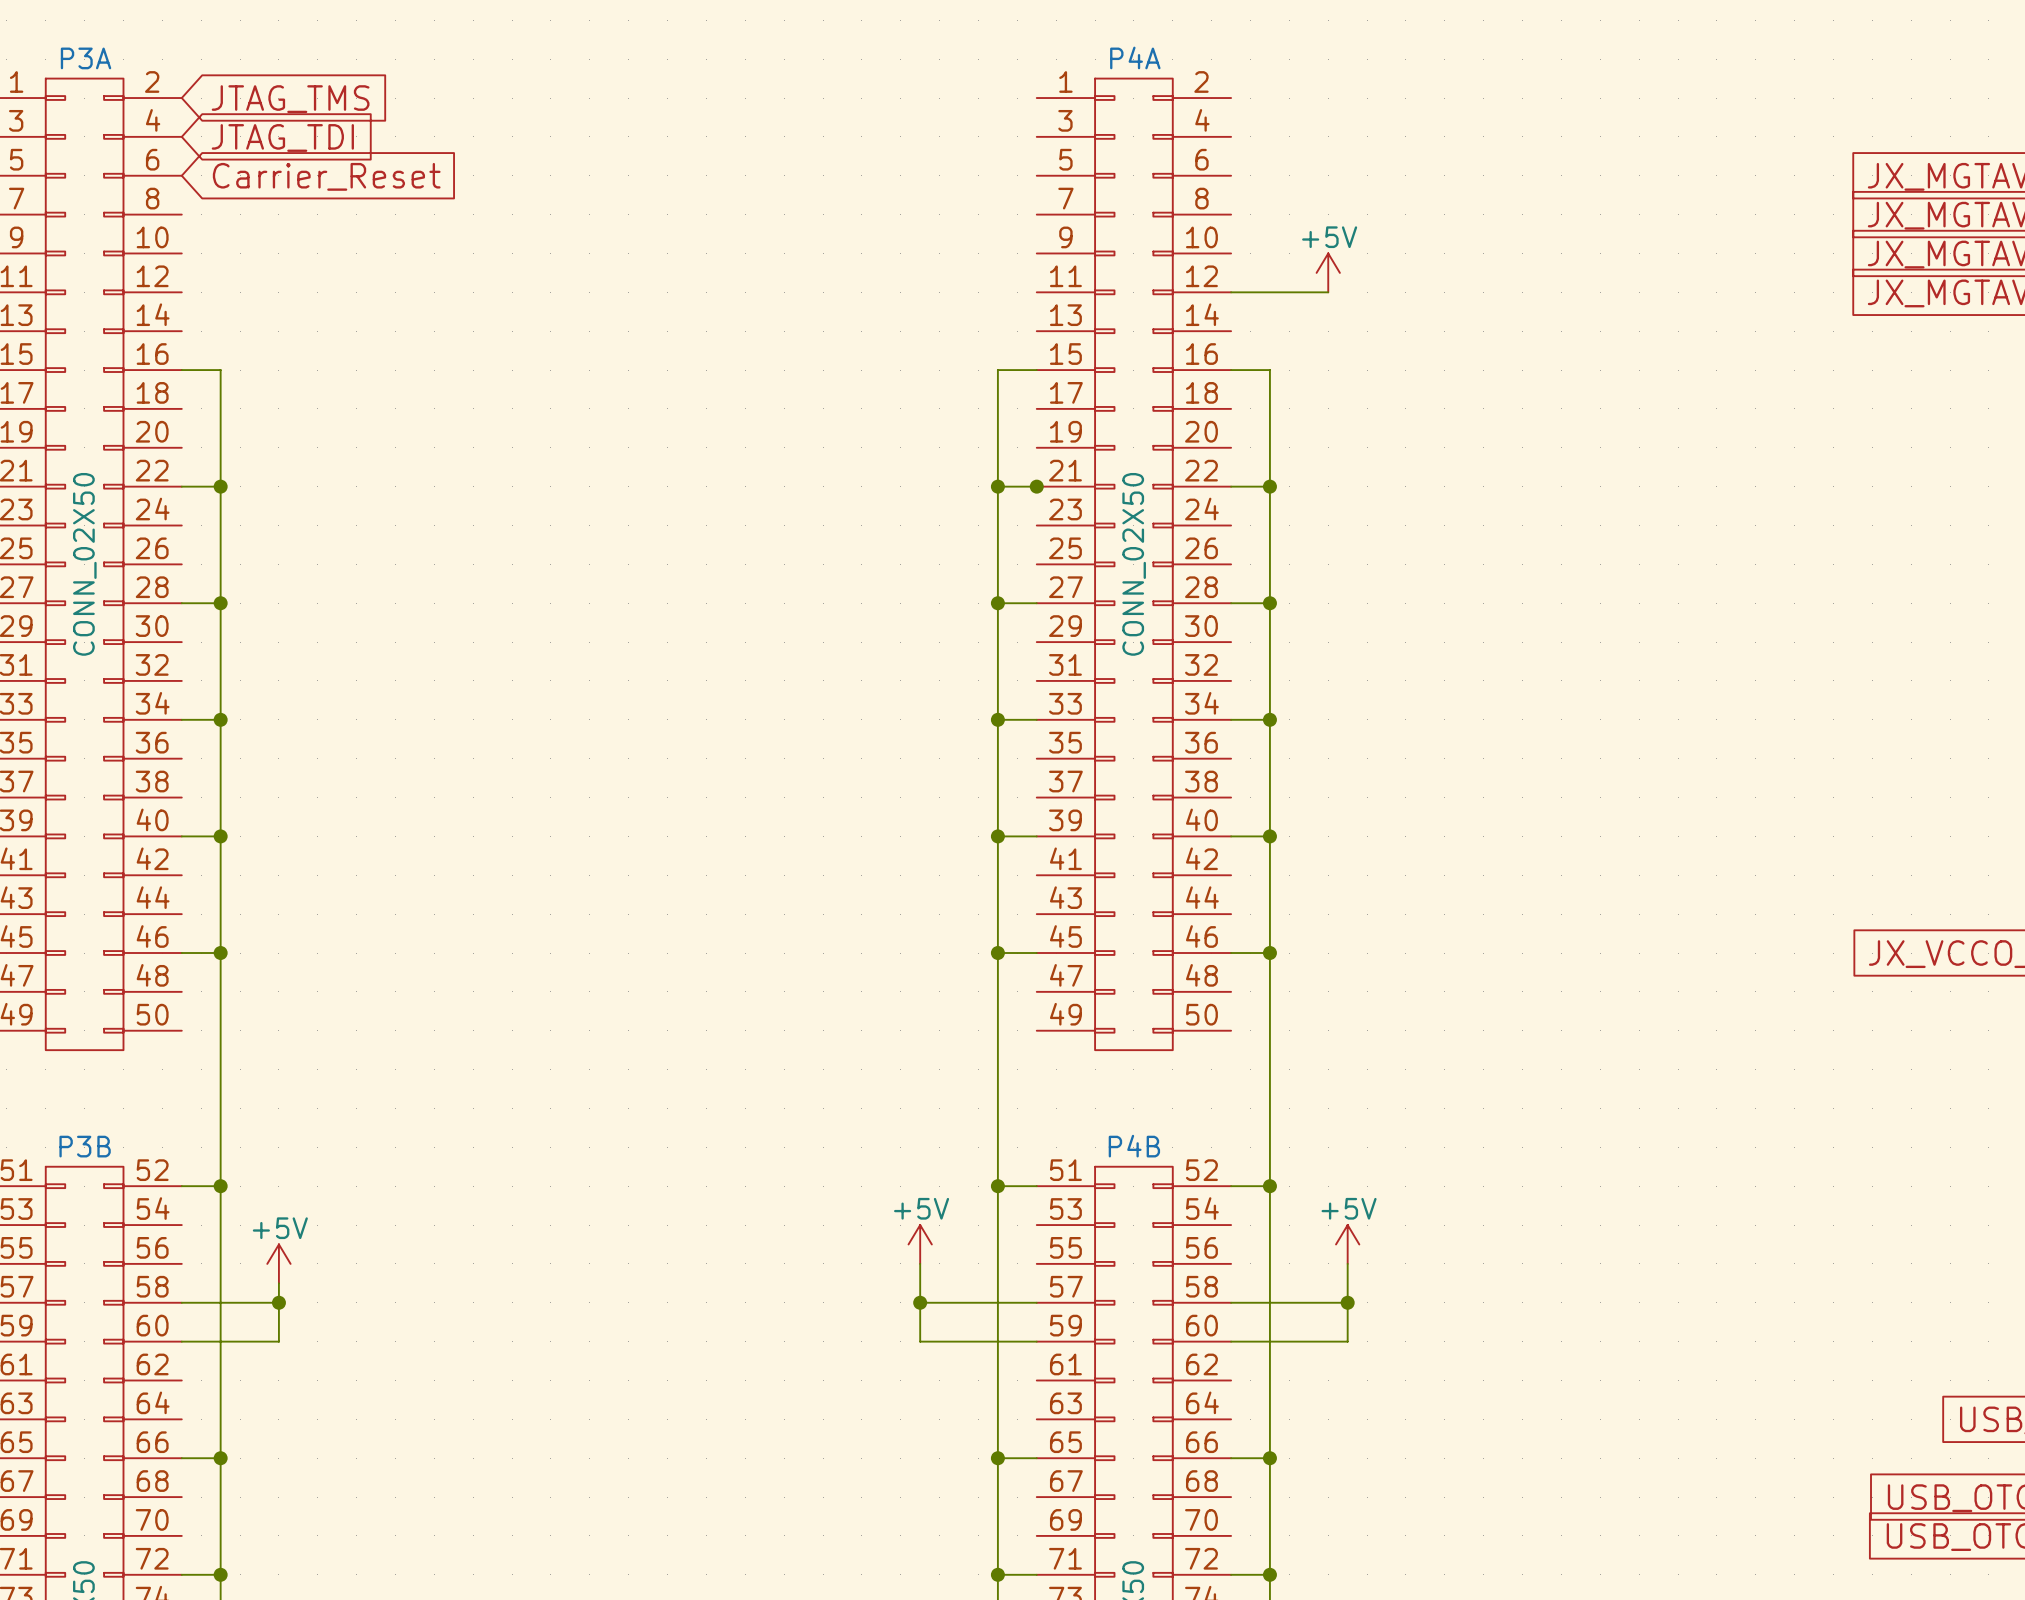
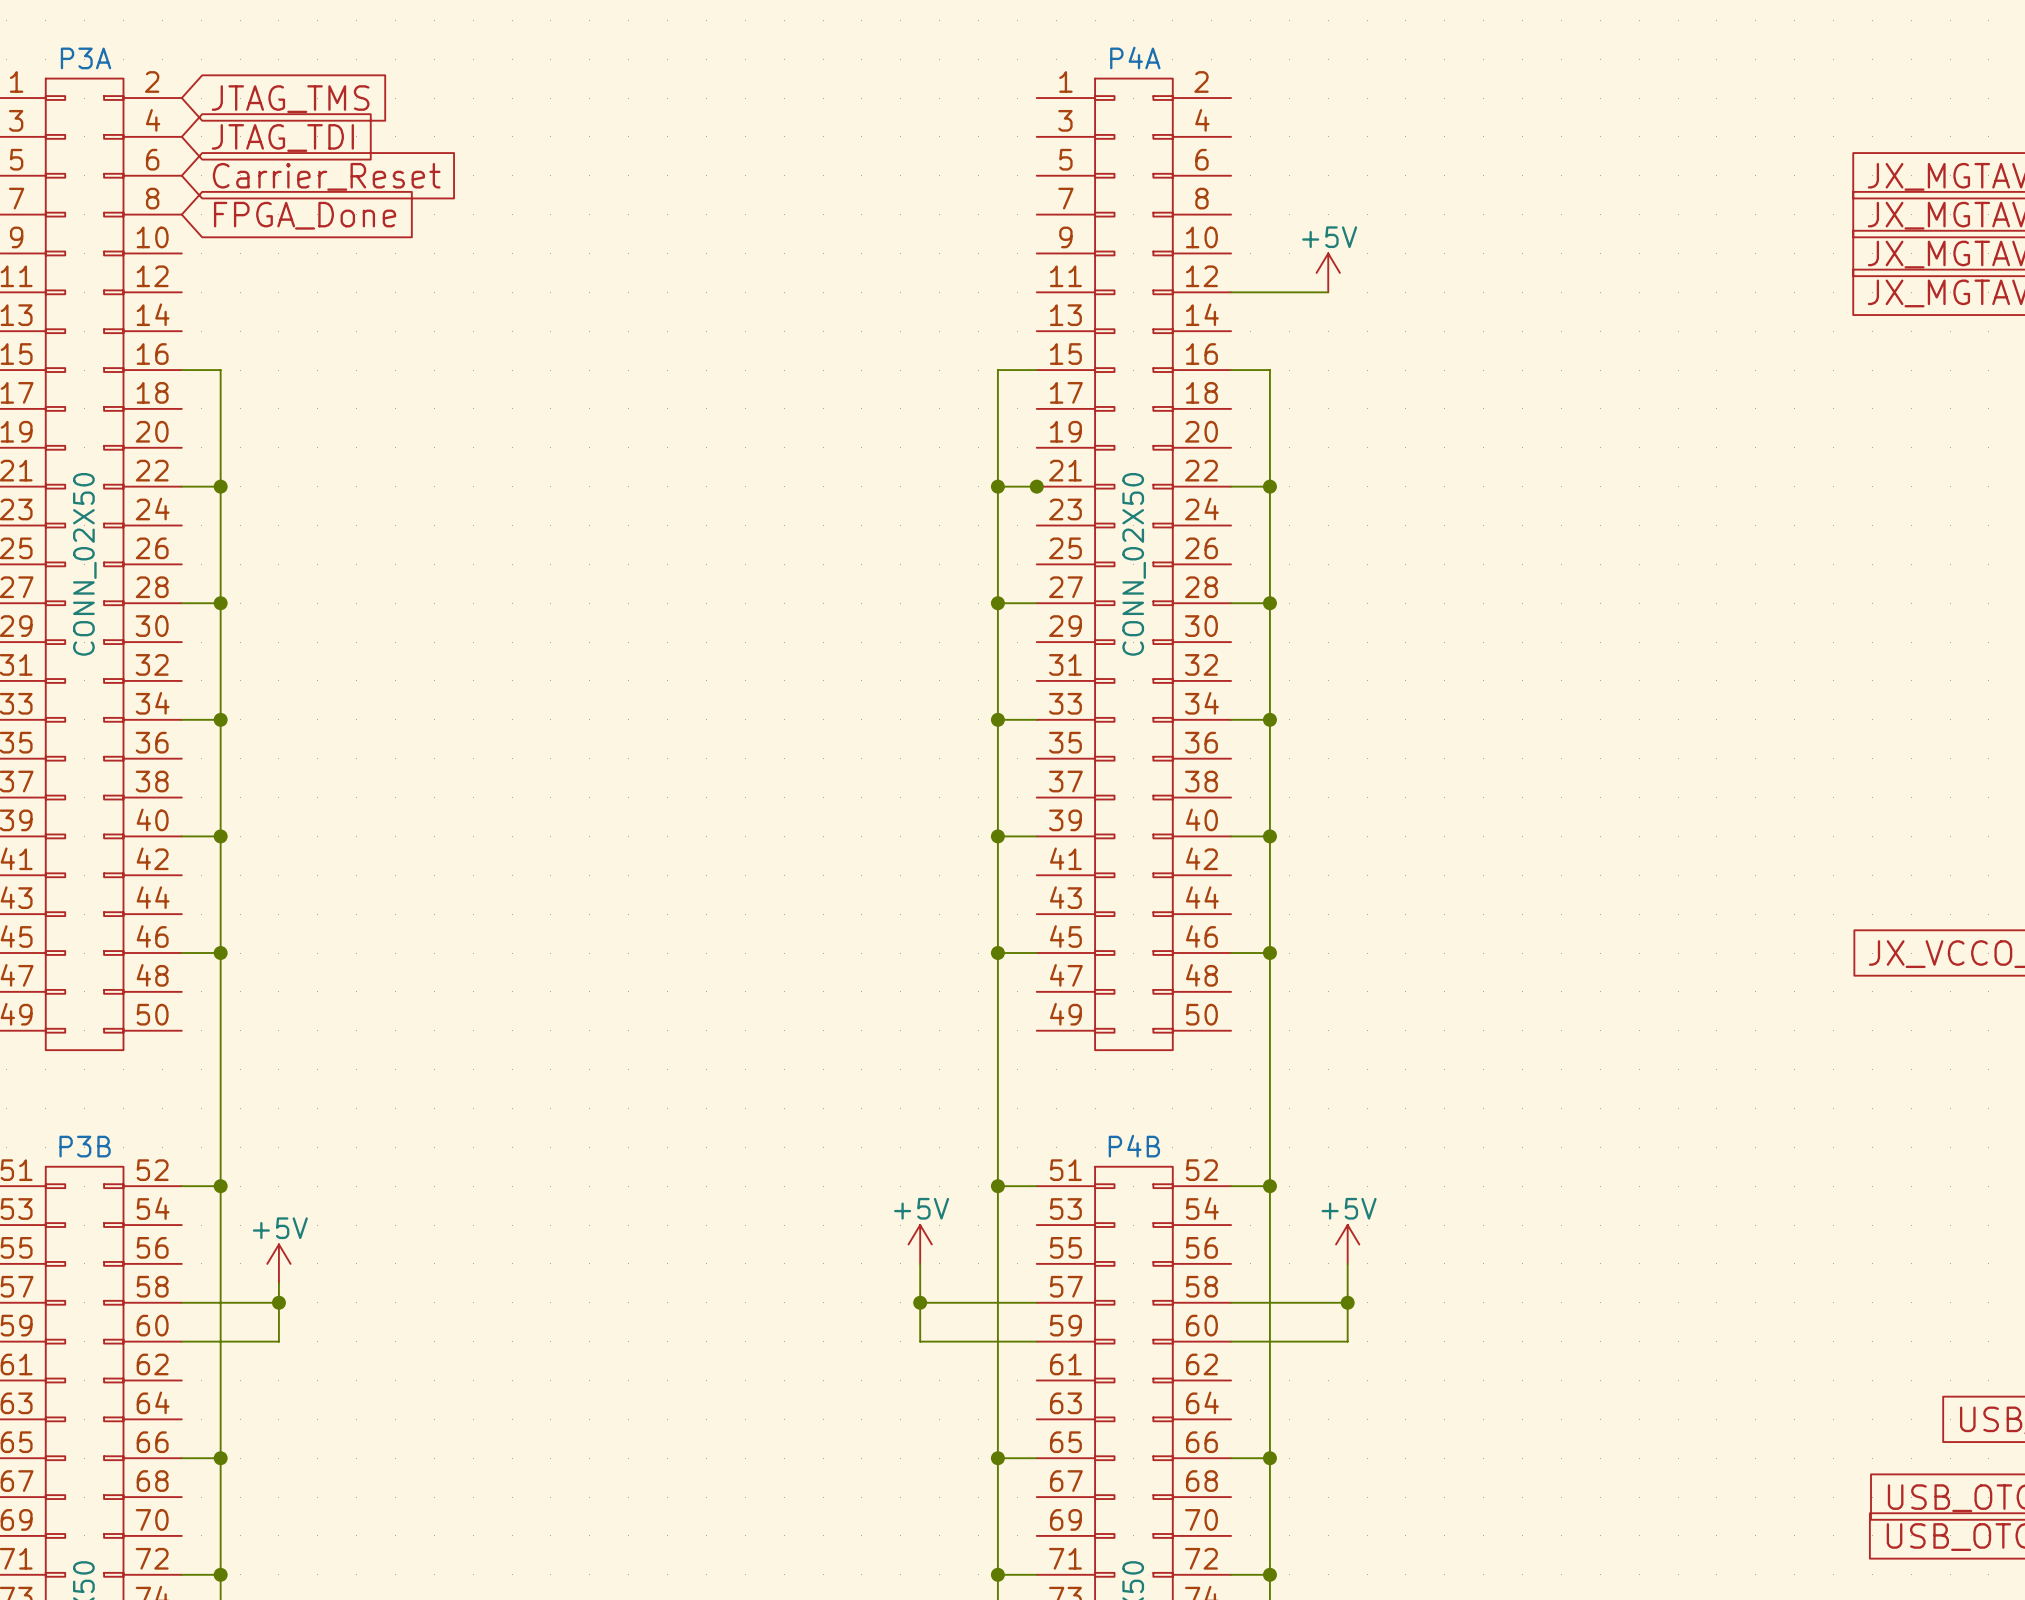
global label: none -> FPGA_Done (305, 215)

